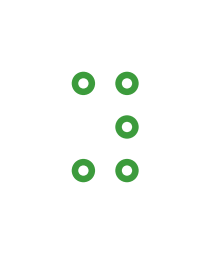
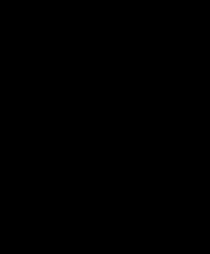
part: (105, 126) -> none

